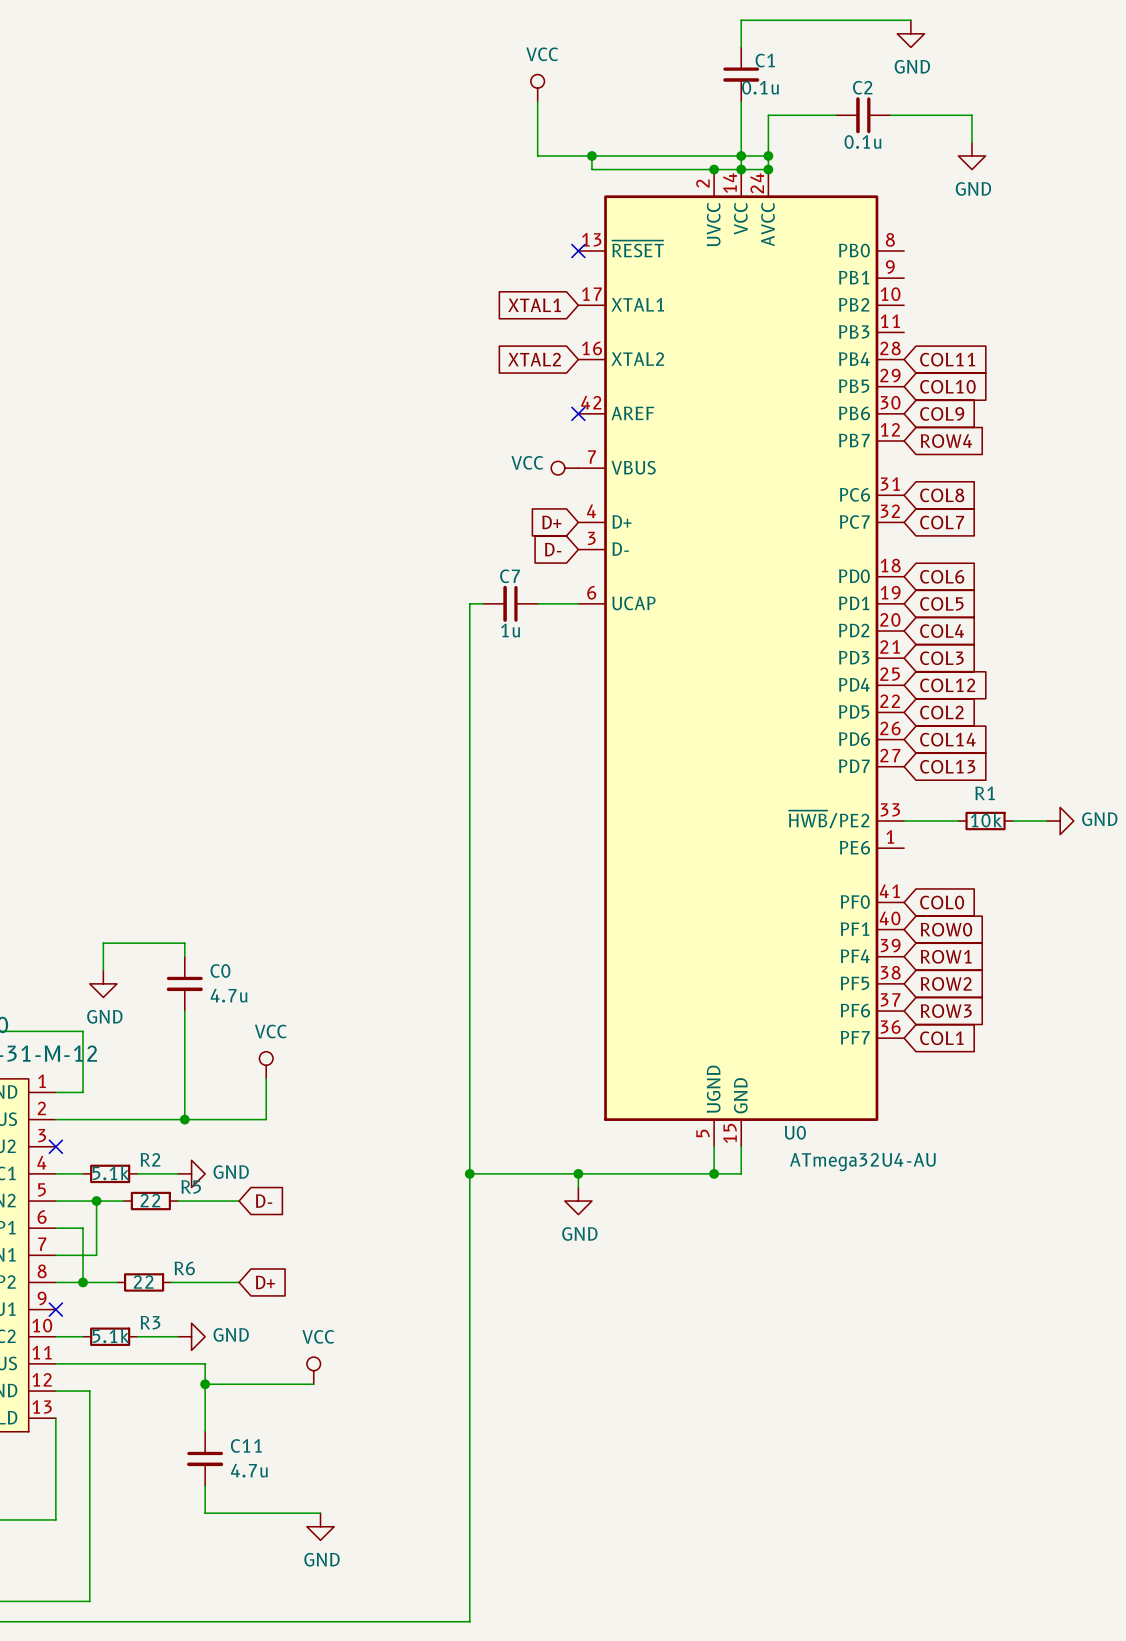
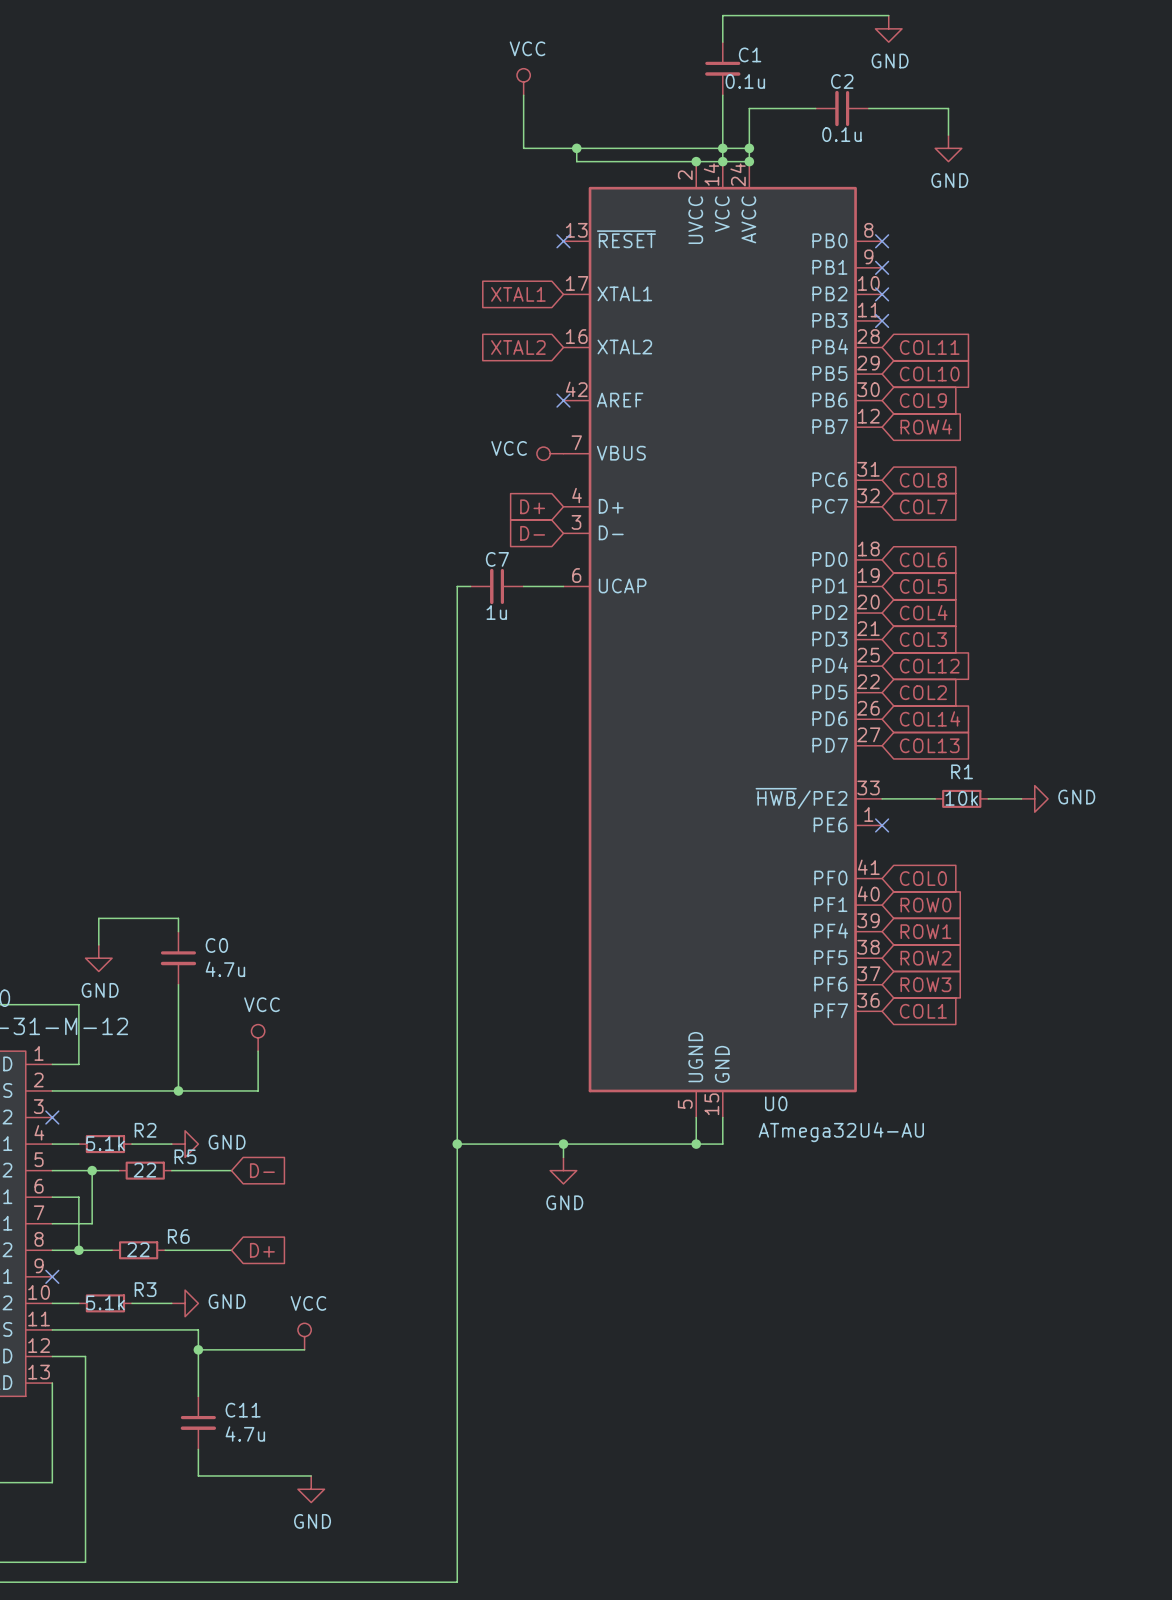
no-connect mark: none -> (882, 241)
no-connect mark: none -> (882, 267)
no-connect mark: none -> (882, 294)
no-connect mark: none -> (882, 320)
no-connect mark: none -> (882, 825)

